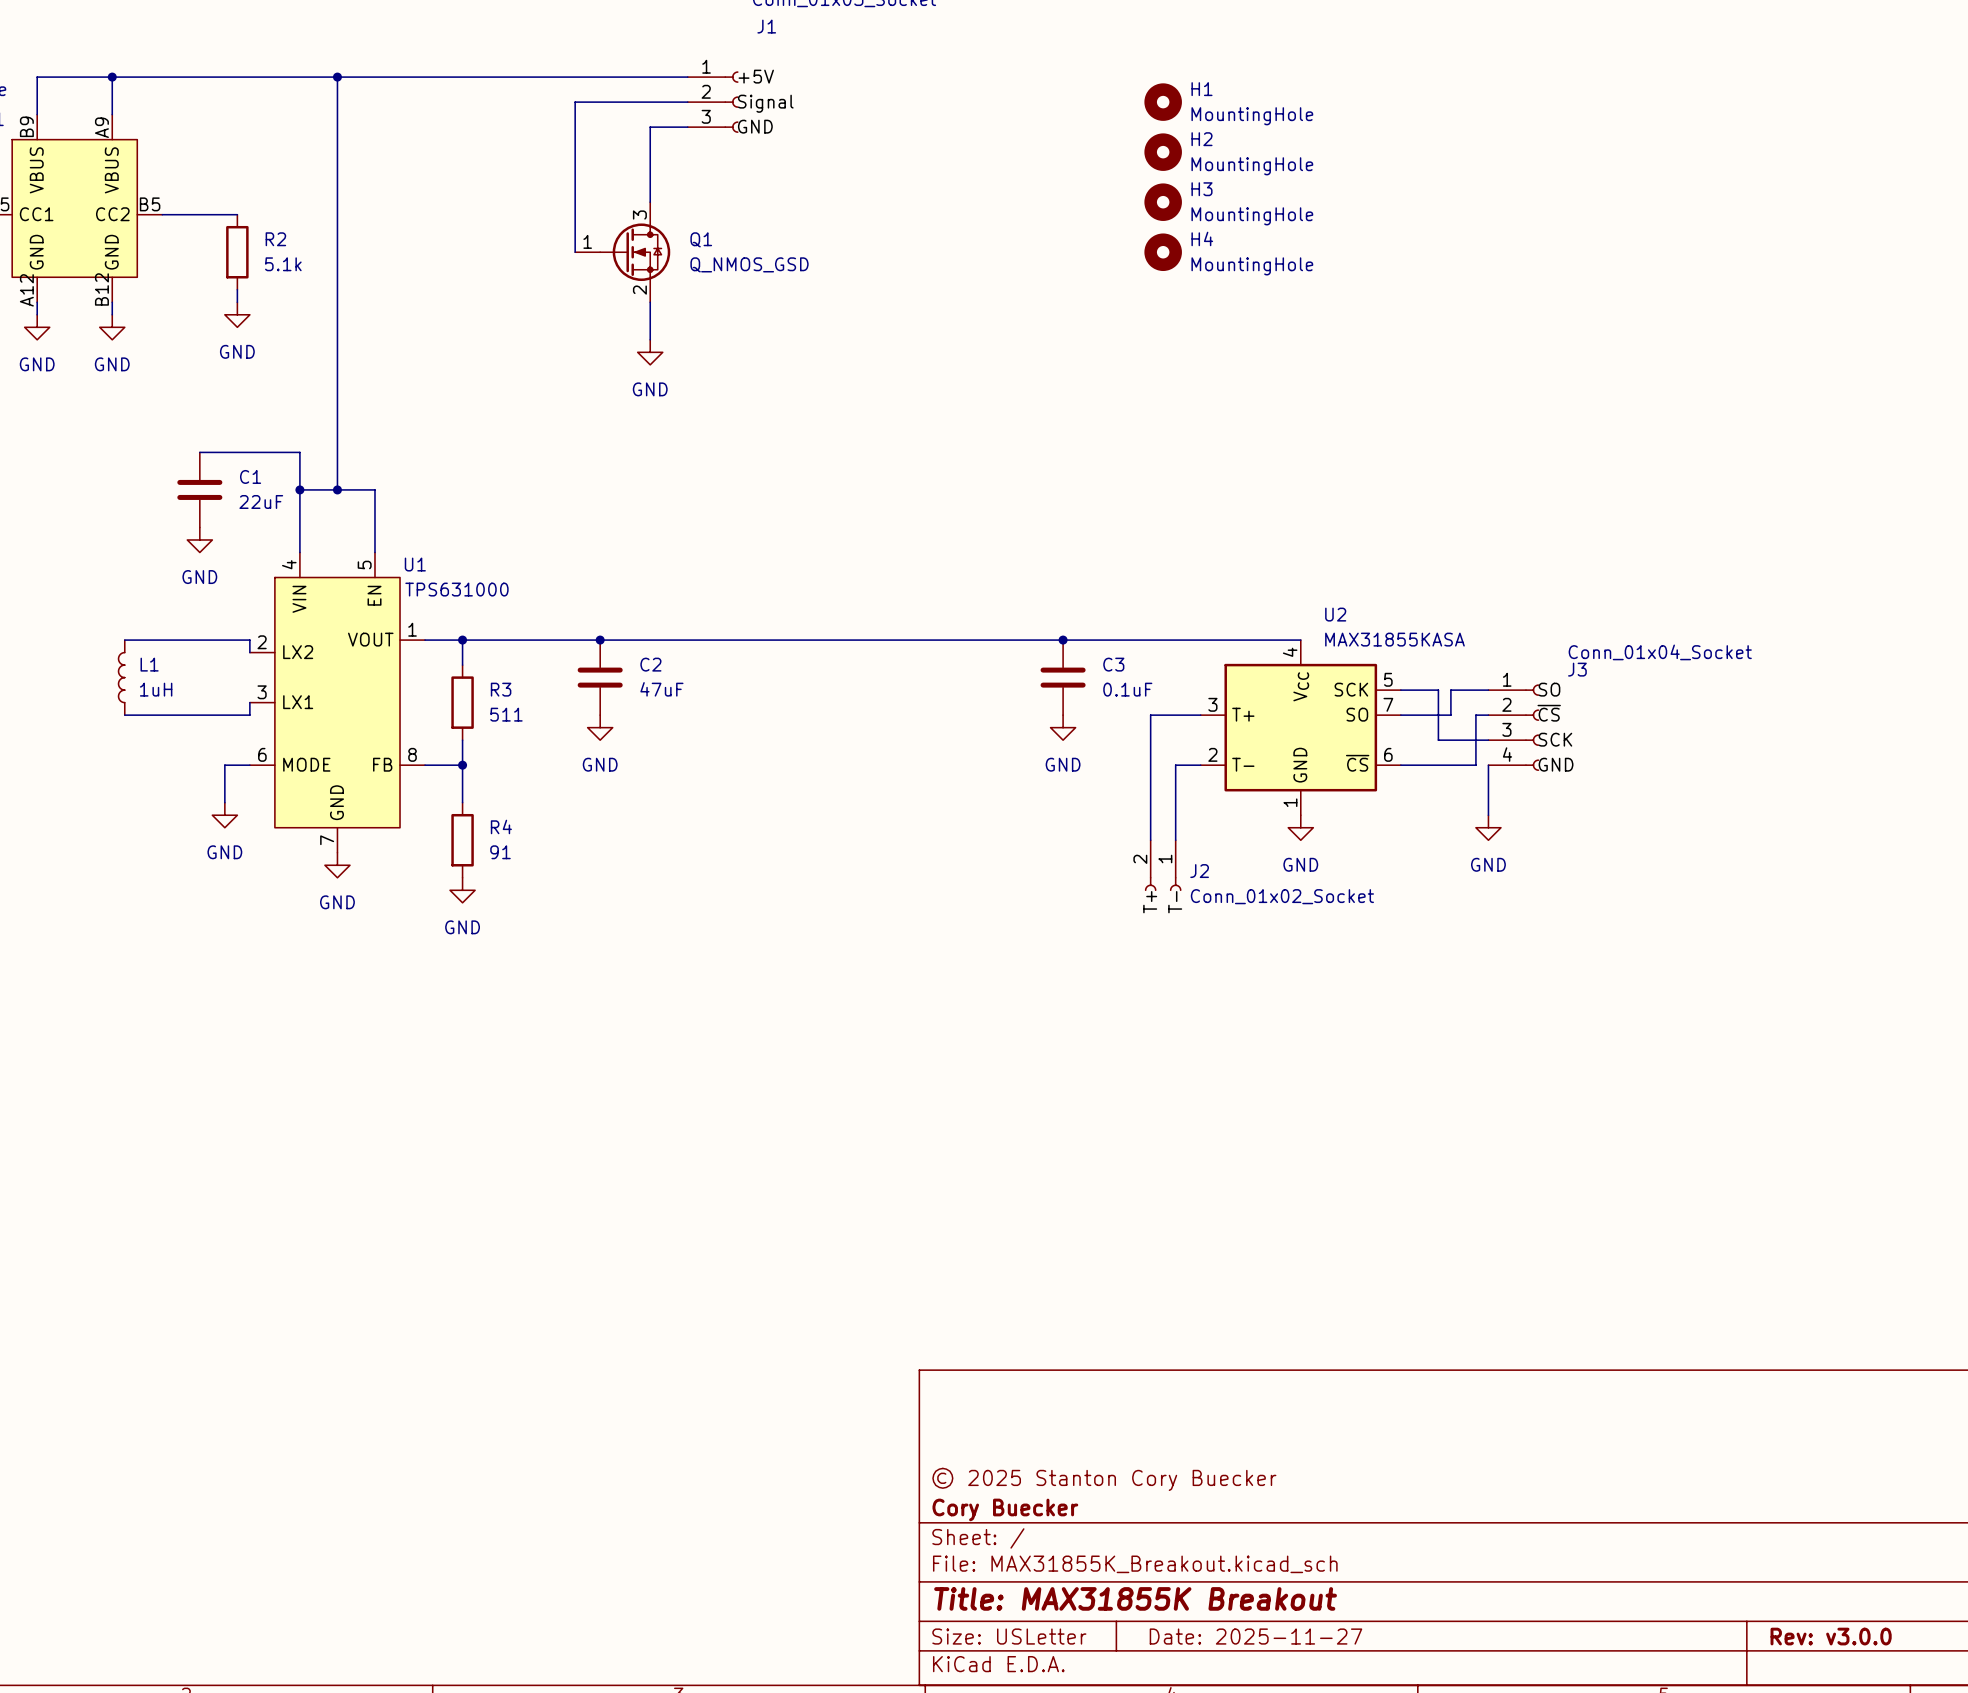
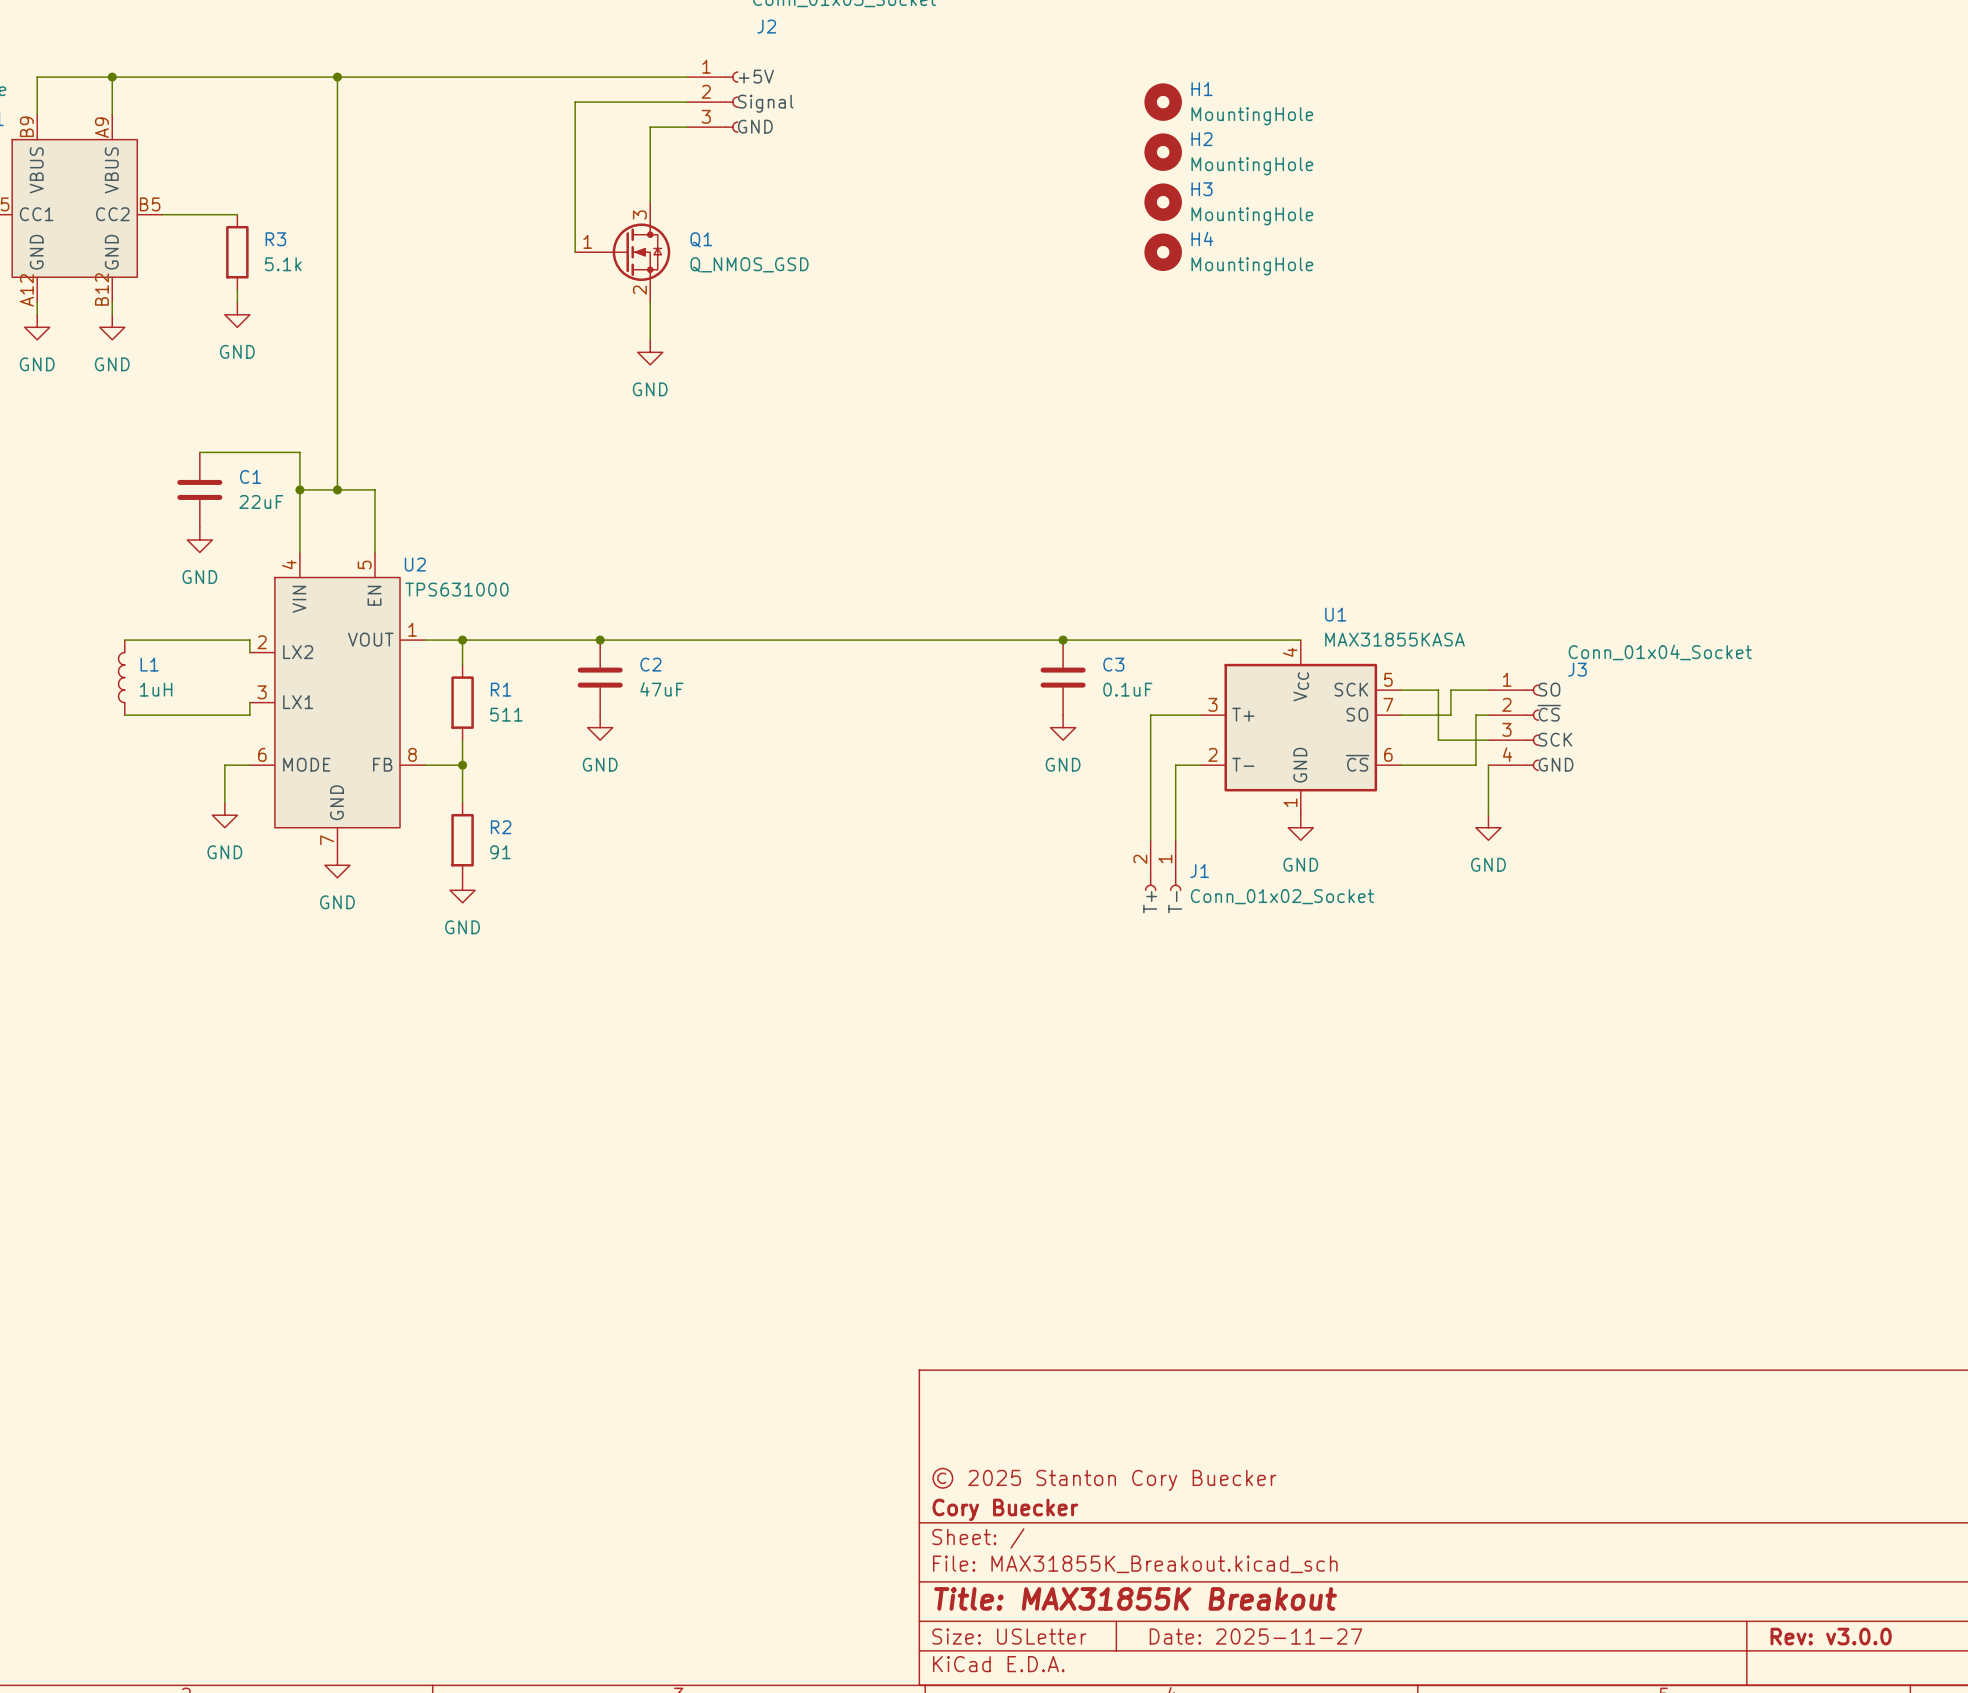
J1 name: J1 (766, 26) -> J2 (766, 26)
R2 name: R2 (275, 239) -> R3 (275, 239)
U1 name: U1 (415, 564) -> U2 (415, 564)
U2 name: U2 (1335, 614) -> U1 (1335, 614)
R3 name: R3 (501, 689) -> R1 (501, 689)
R4 name: R4 (501, 826) -> R2 (501, 827)
J2 name: J2 (1199, 871) -> J1 (1199, 871)

